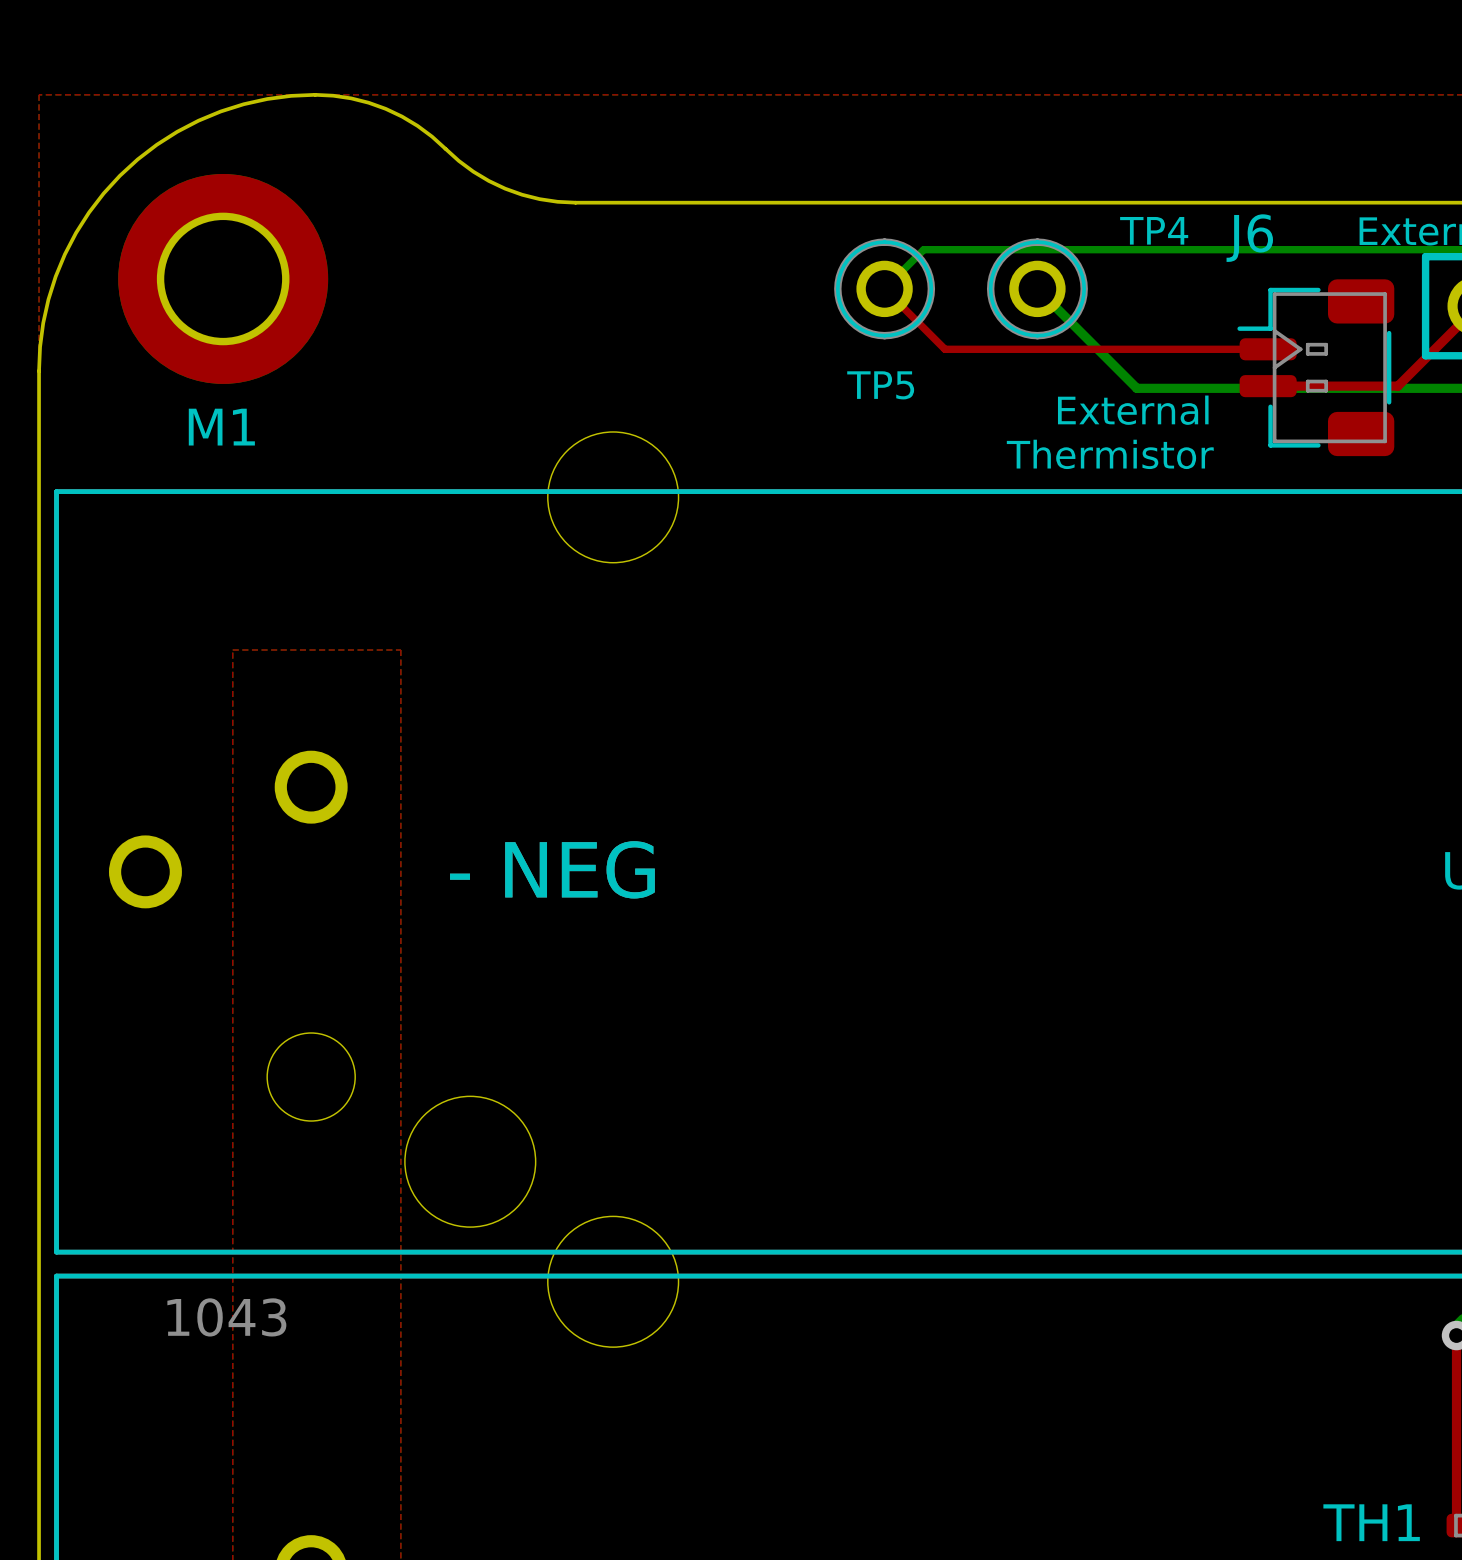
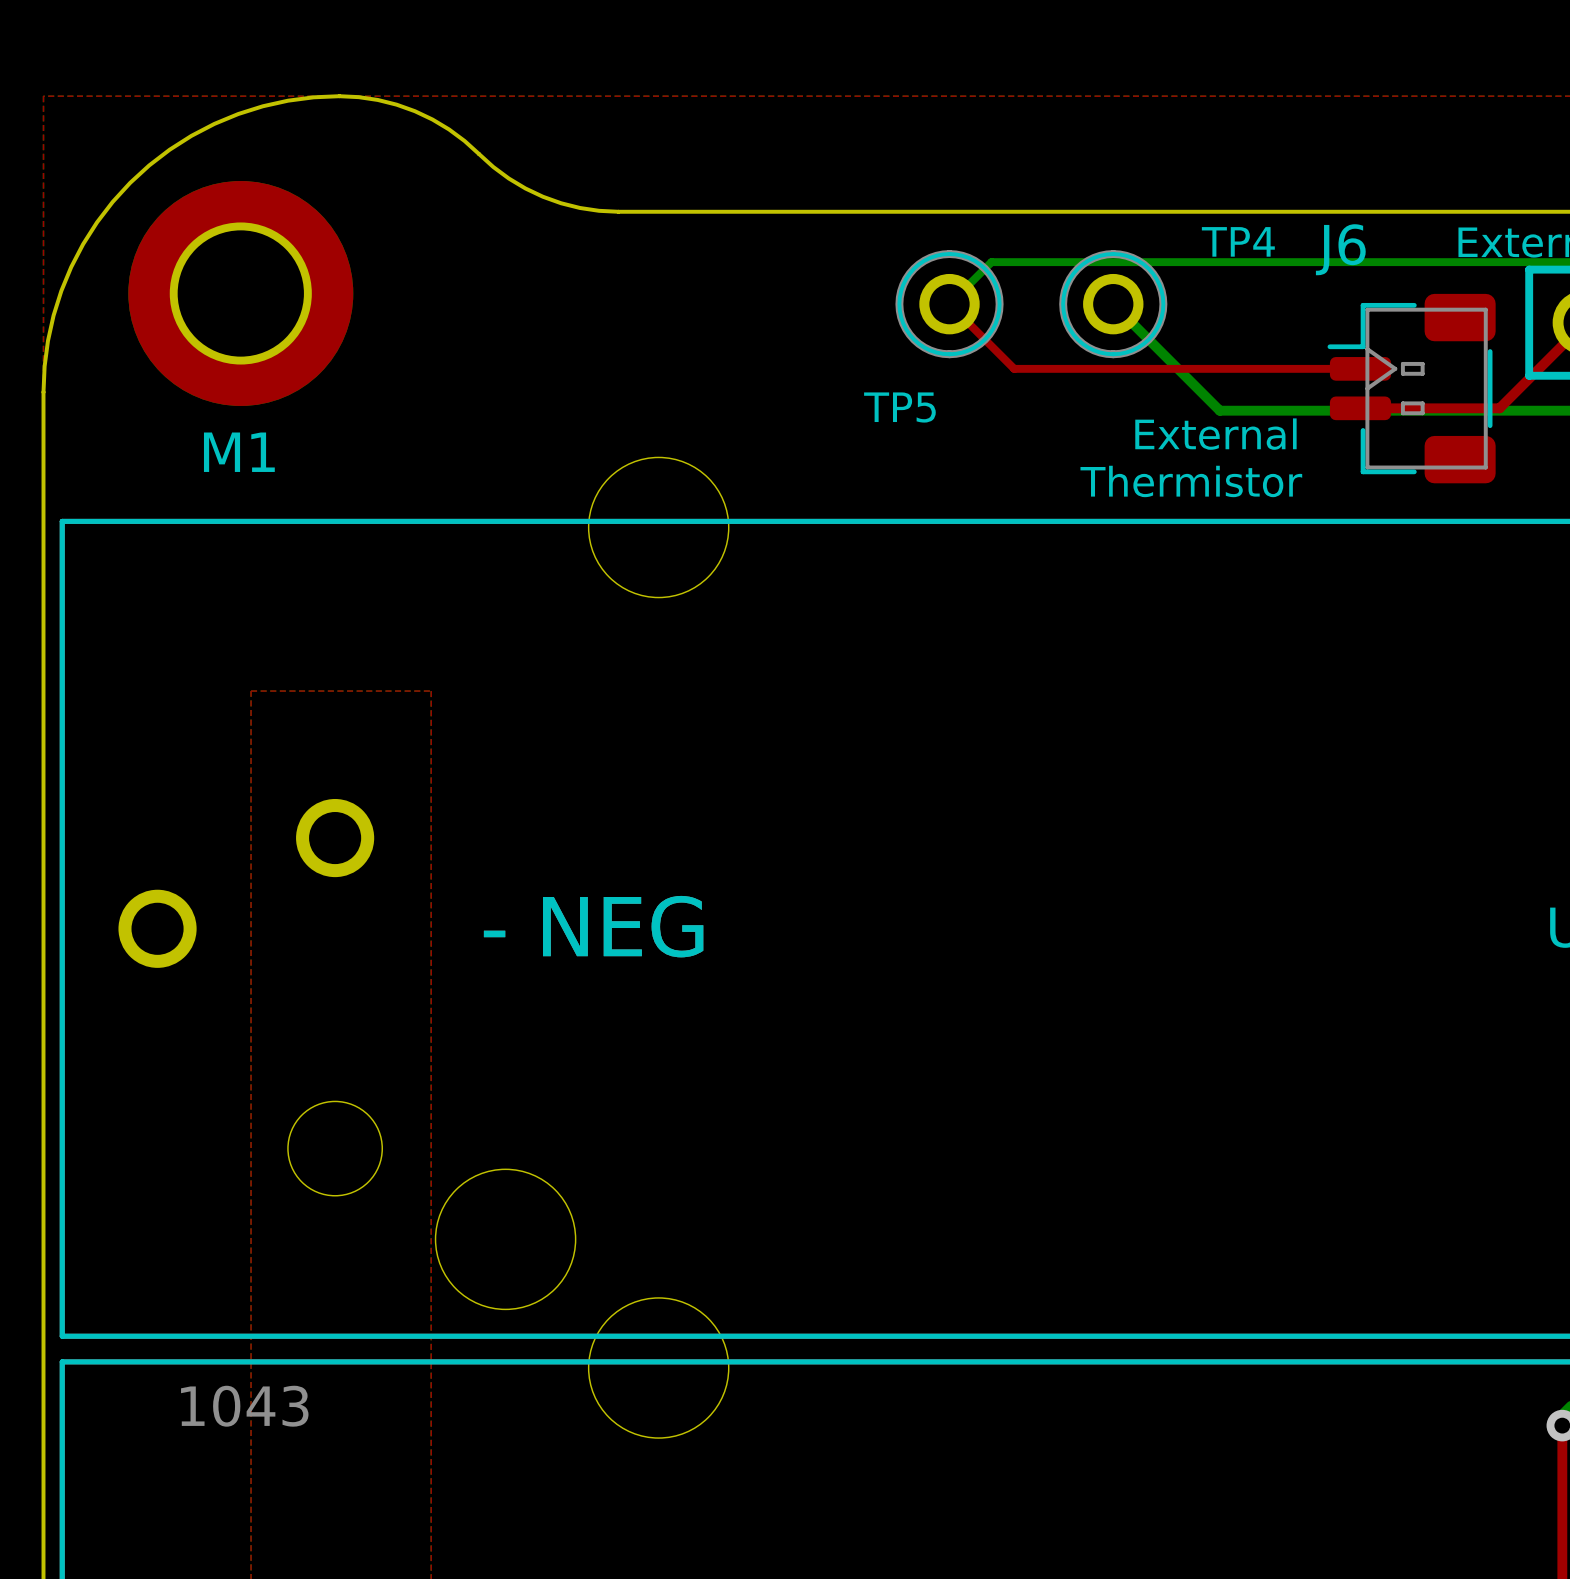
TP5 name position: TP5 (880, 385) -> TP5 (899, 407)

